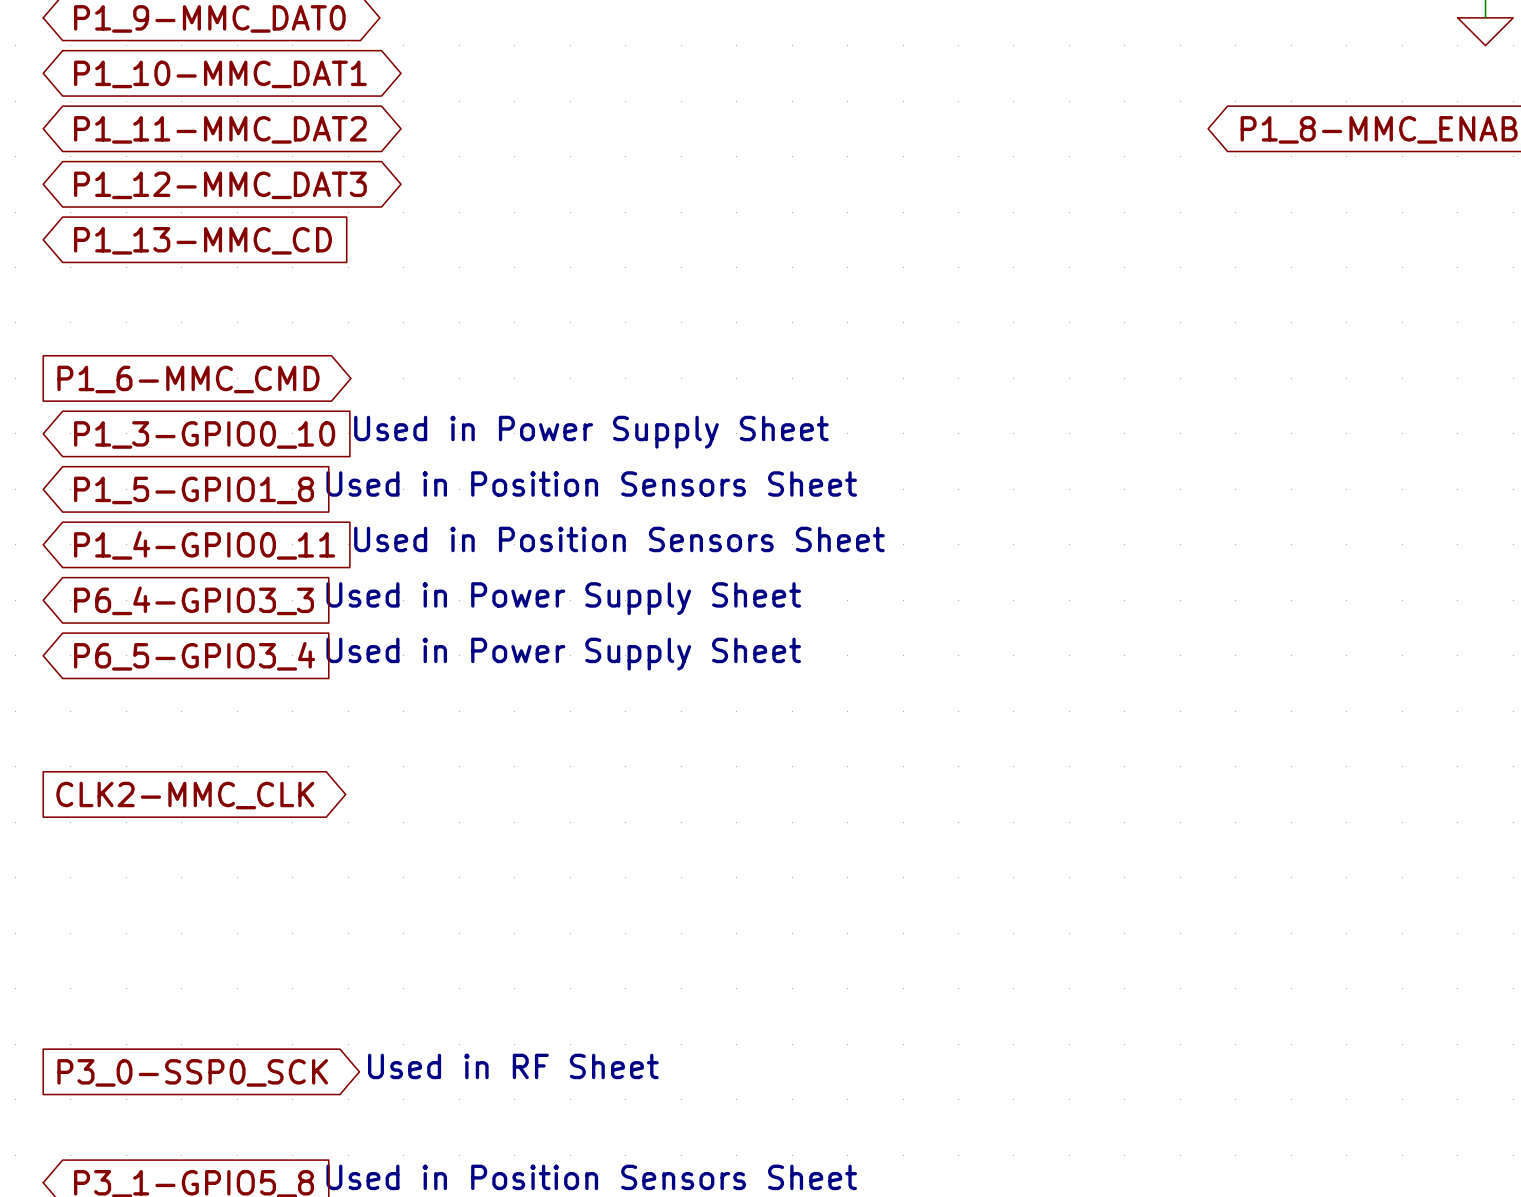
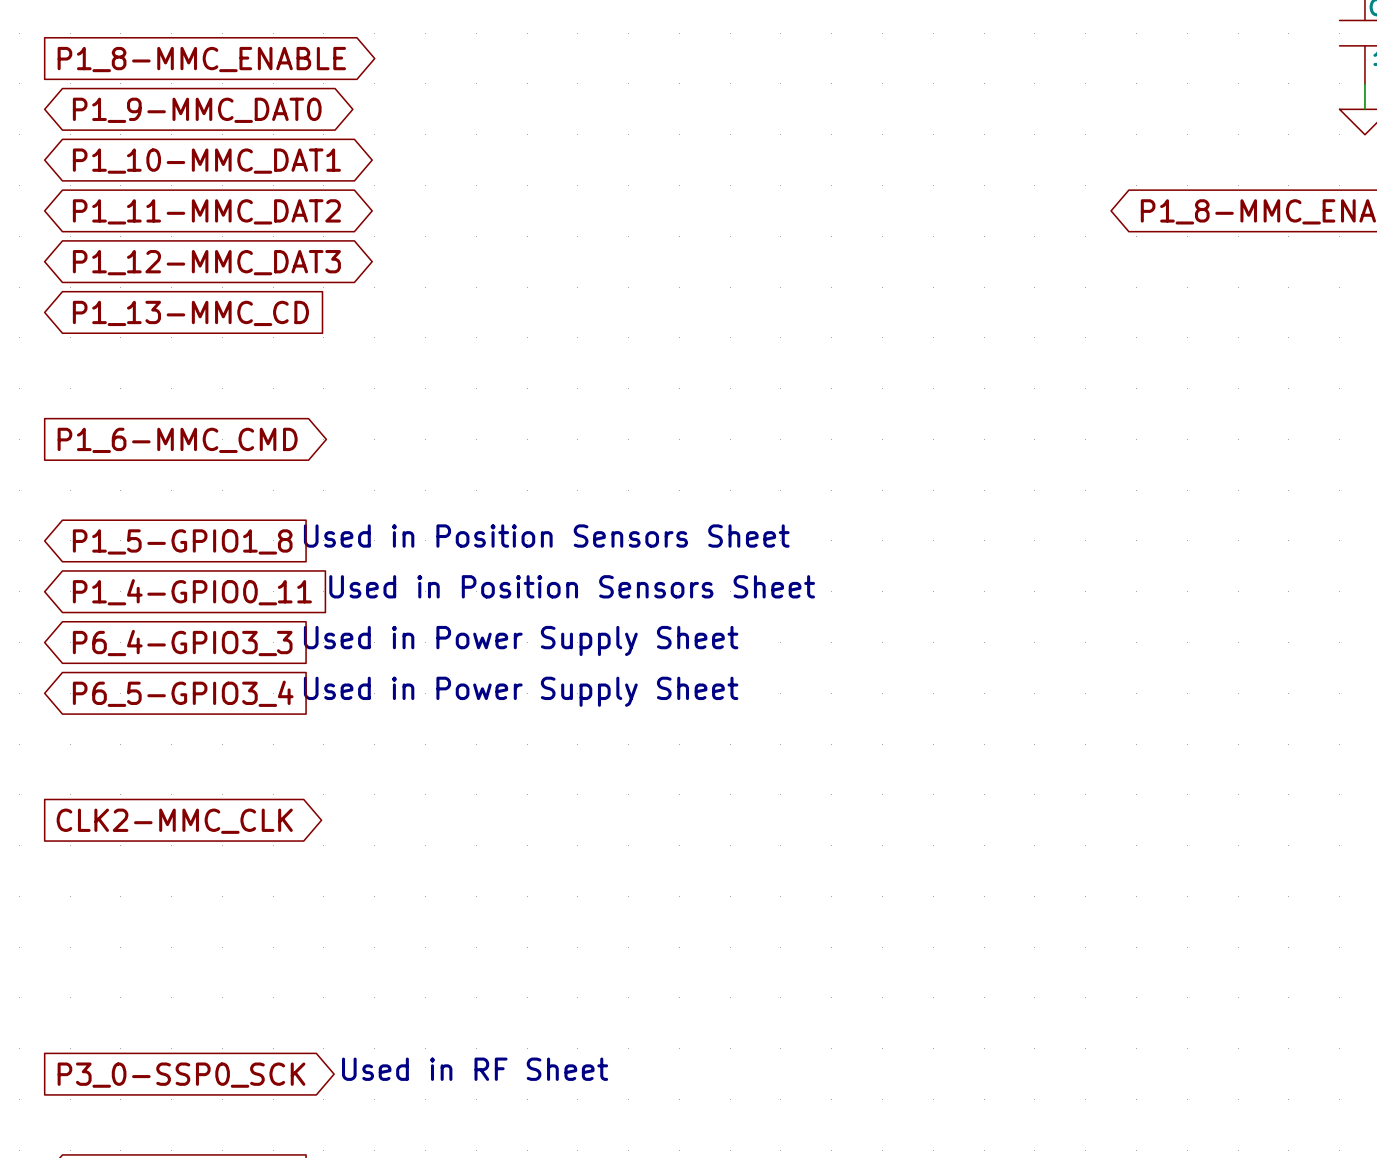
text: Used in Power Supply Sheet (591, 432) -> none
global label: P1_3-GPIO0_10 (204, 434) -> none

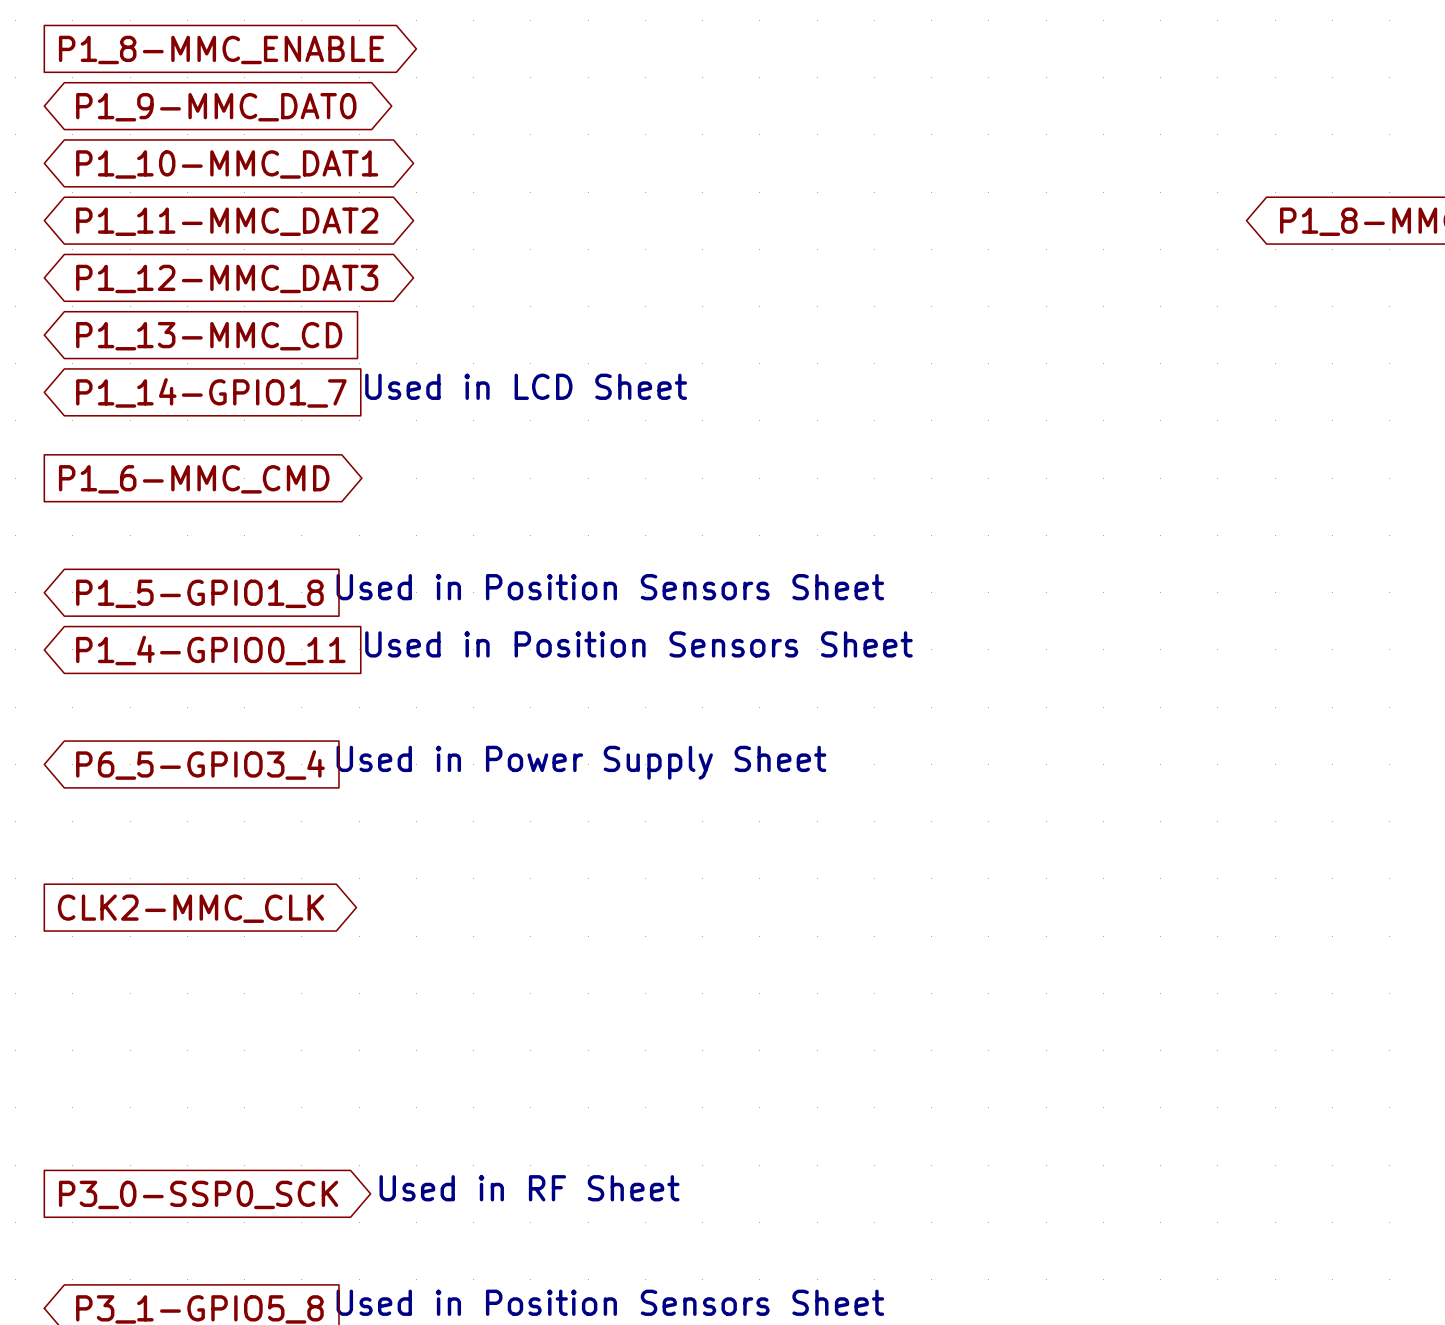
text: none -> Used in LCD Sheet (526, 386)
global label: none -> P1_14-GPIO1_7 (211, 392)
text: Used in Power Supply Sheet (521, 640) -> none
global label: P6_4-GPIO3_3 (182, 643) -> none

